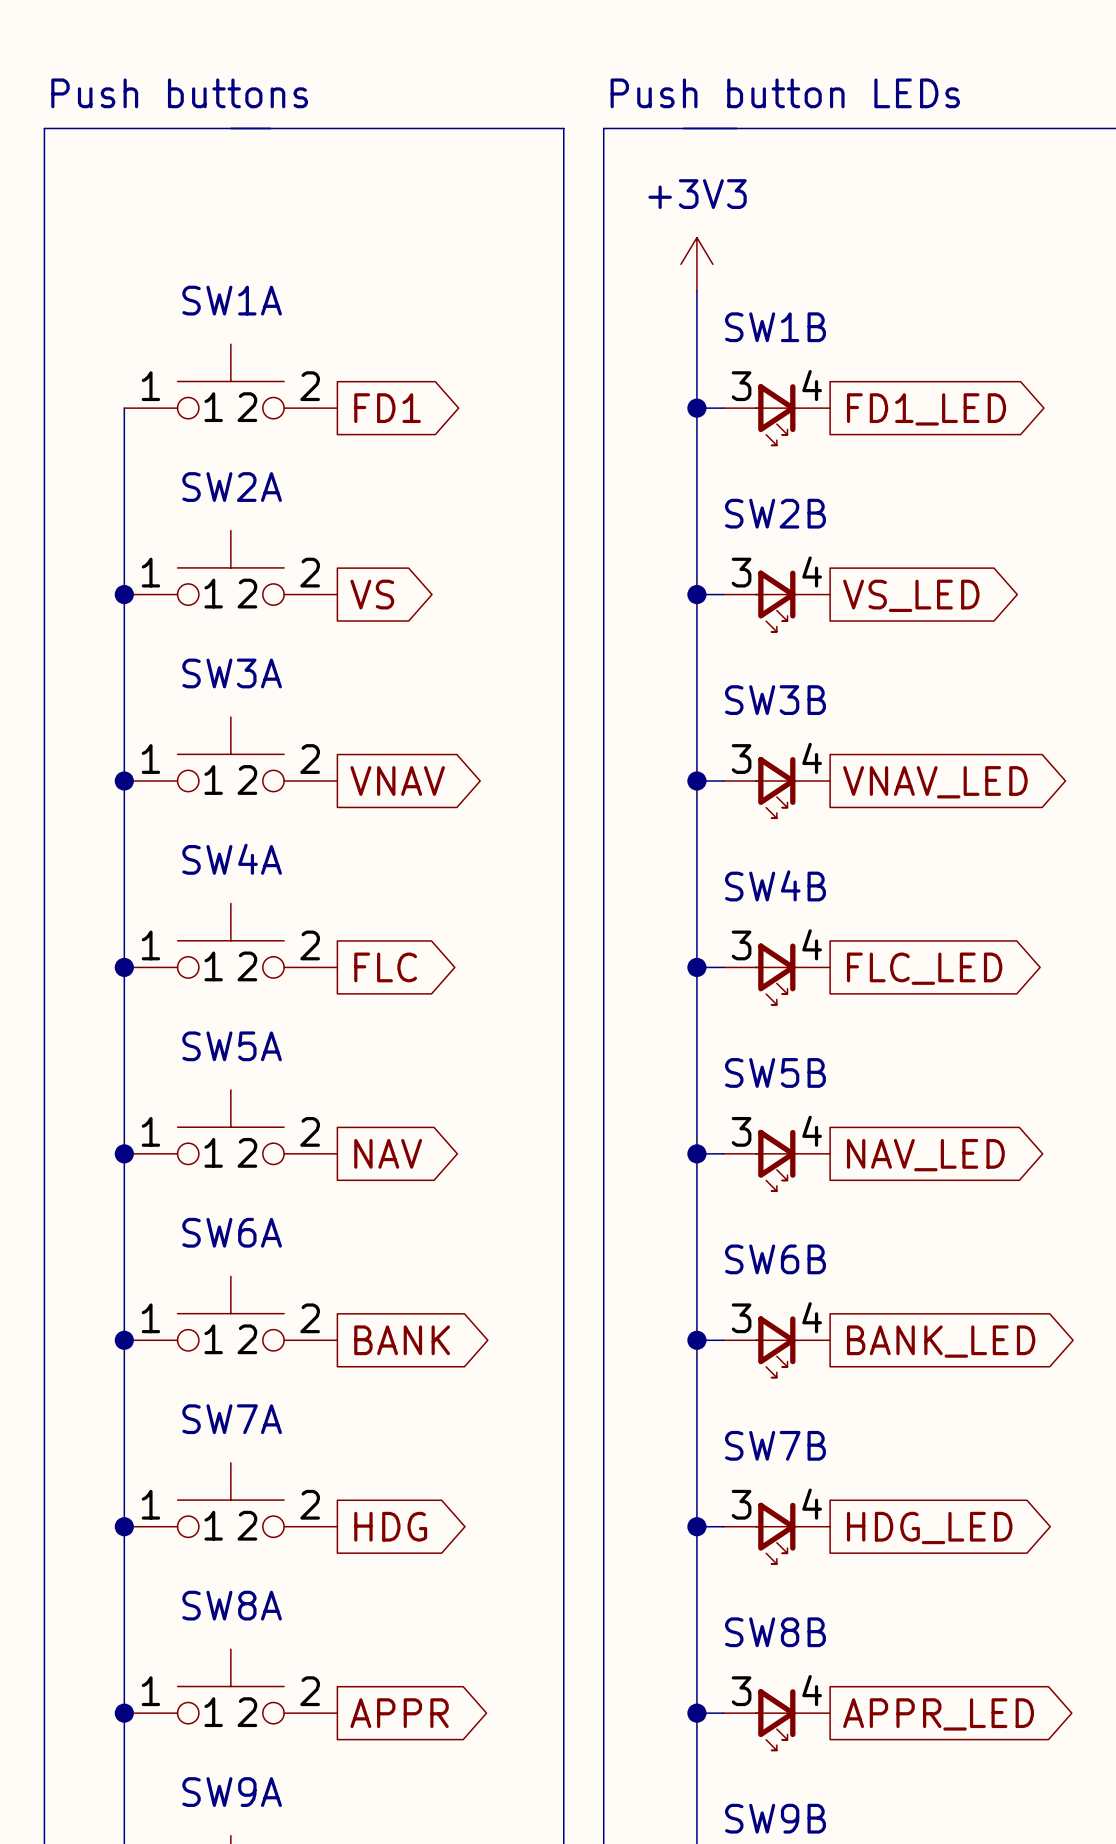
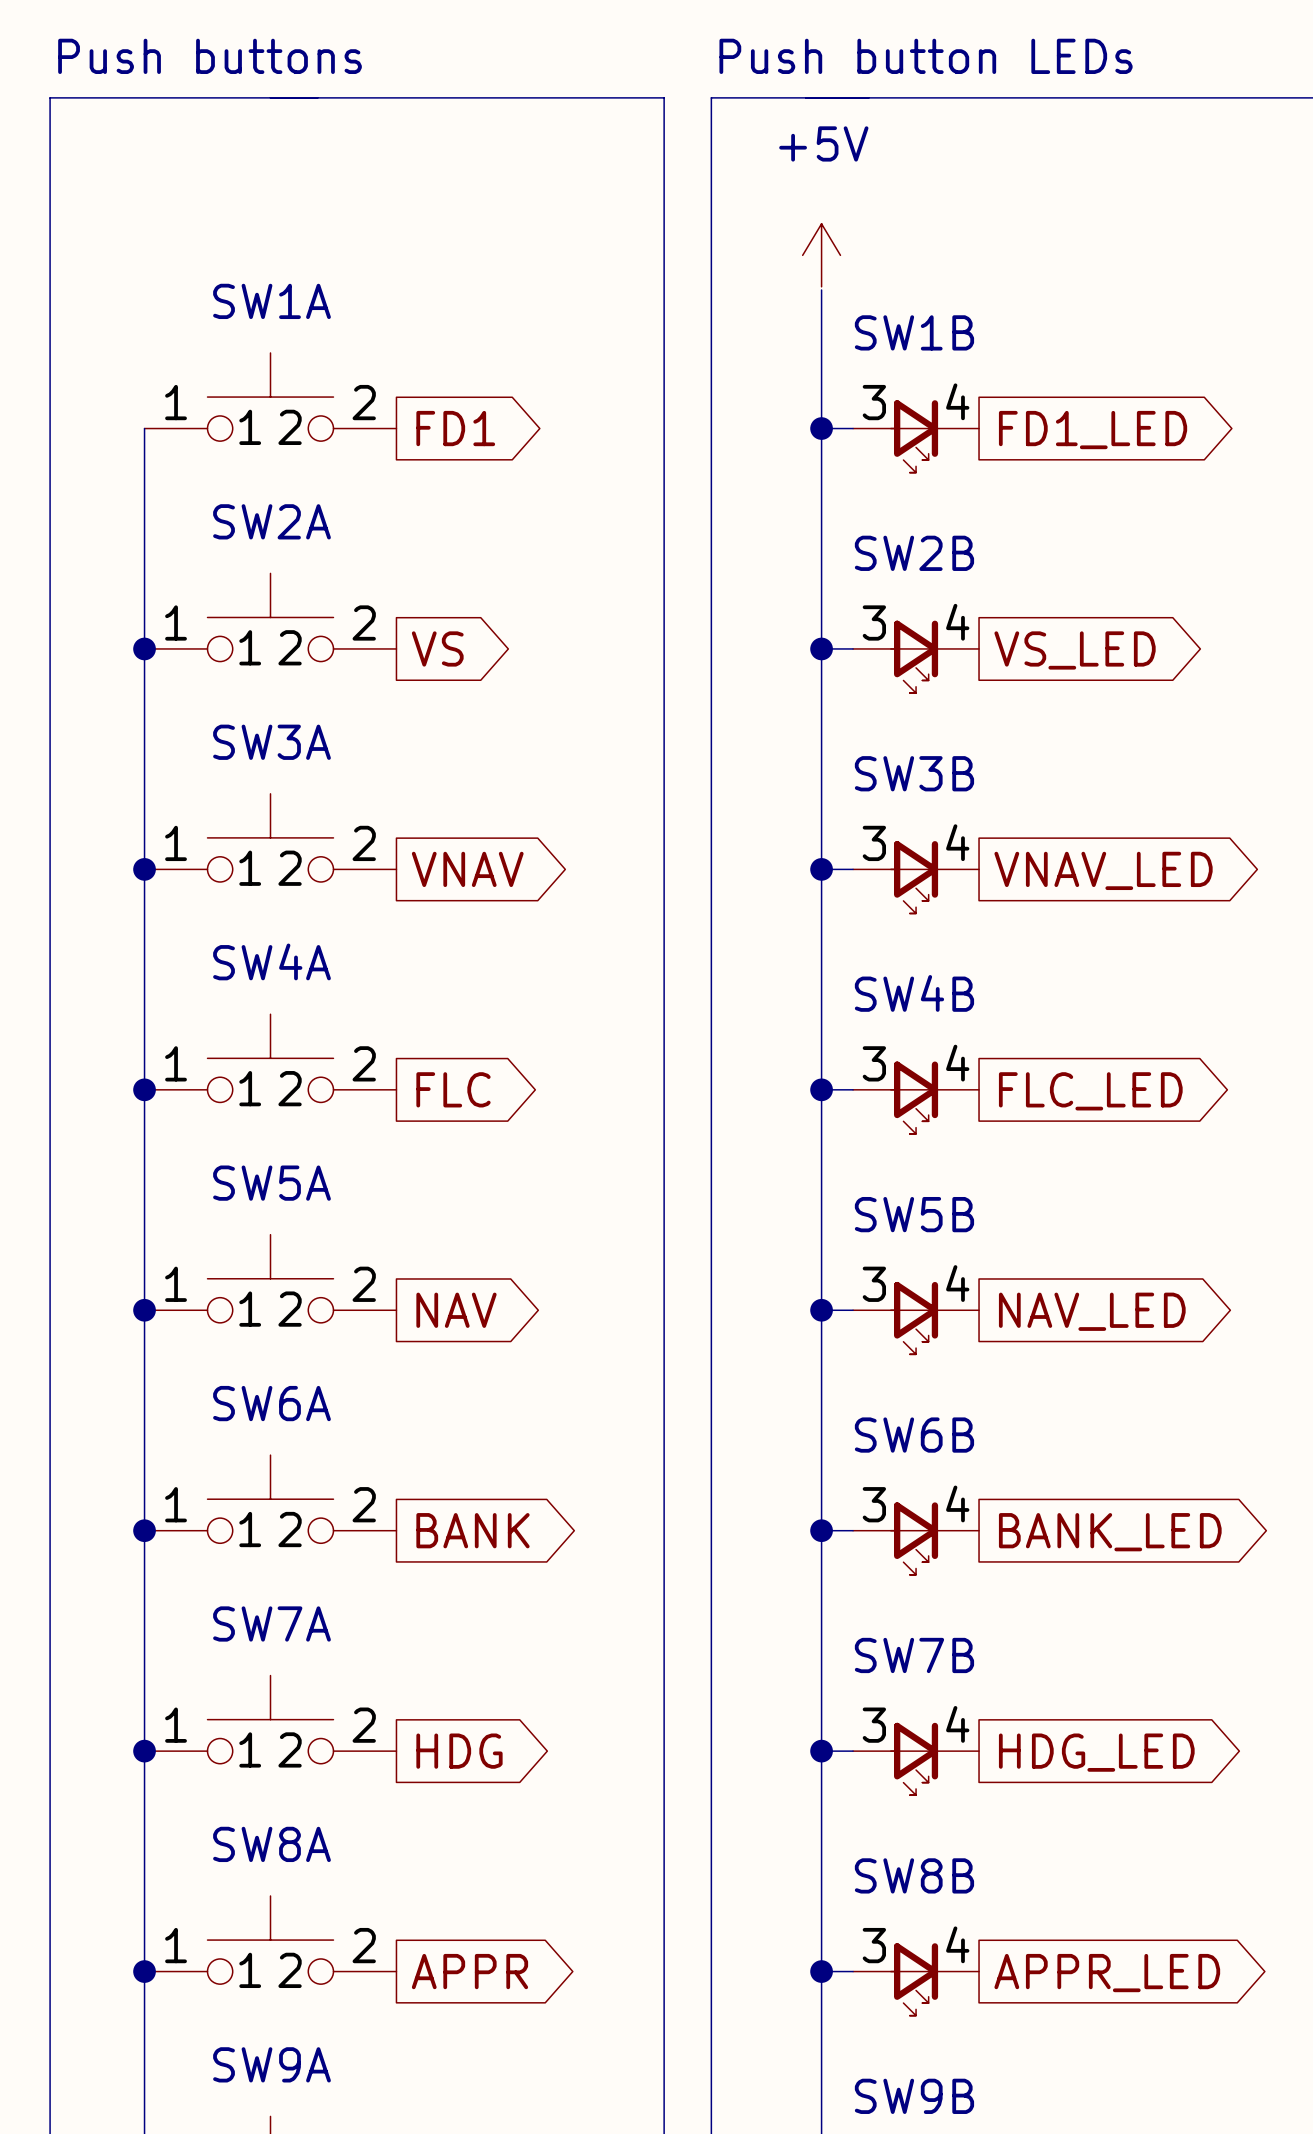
power symbol: +3V3 (696, 264) -> +5V (821, 255)

